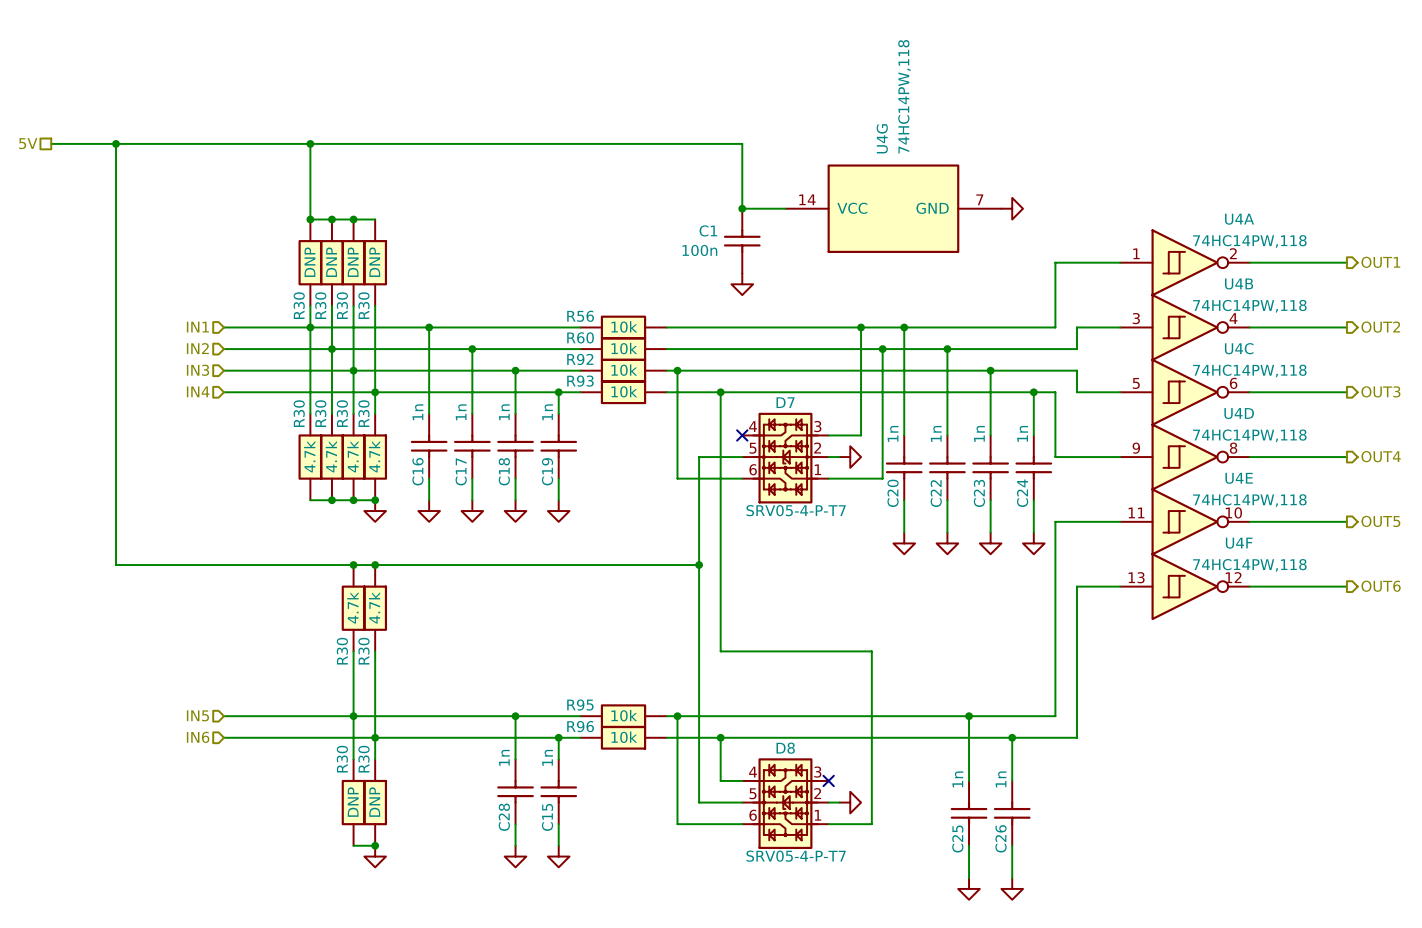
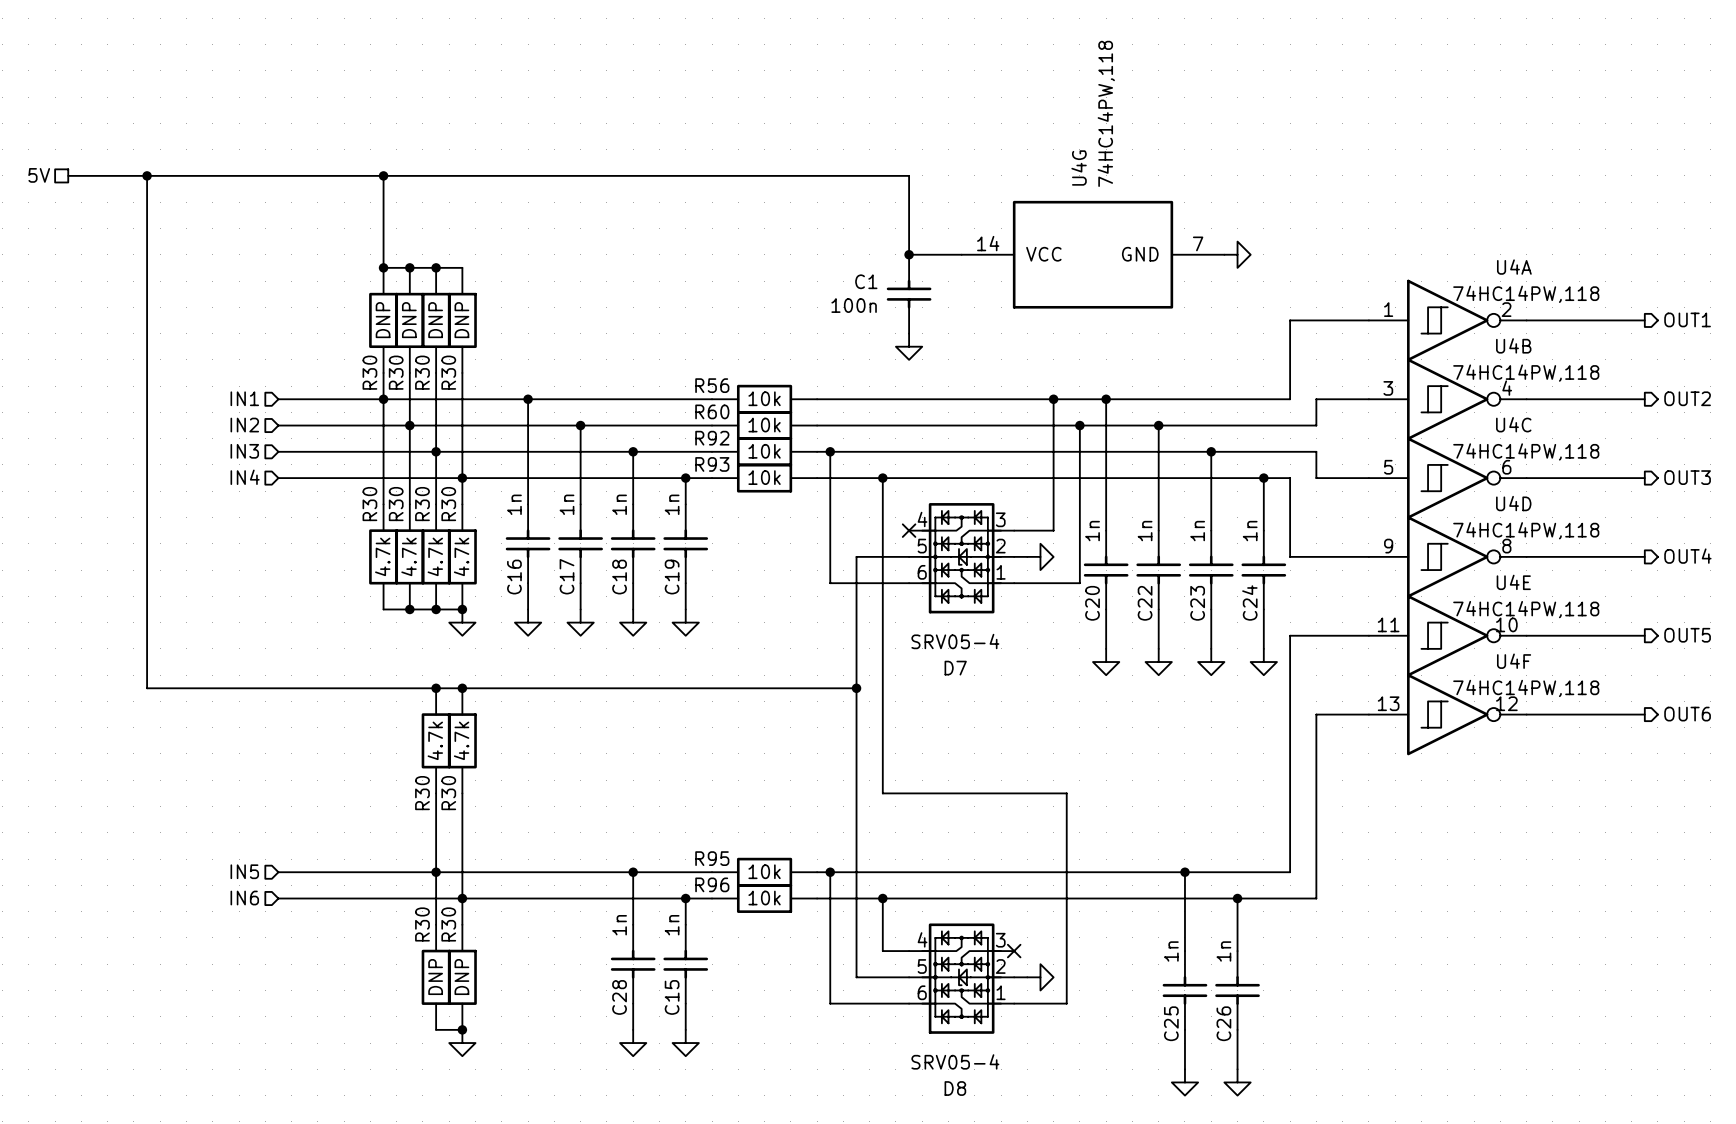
D7 name position: D7 (785, 402) -> D7 (955, 668)
D7 value: SRV05-4-P-T7 (796, 510) -> SRV05-4 (955, 641)
D8 name position: D8 (785, 748) -> D8 (955, 1088)
D8 value: SRV05-4-P-T7 (796, 856) -> SRV05-4 (955, 1061)

